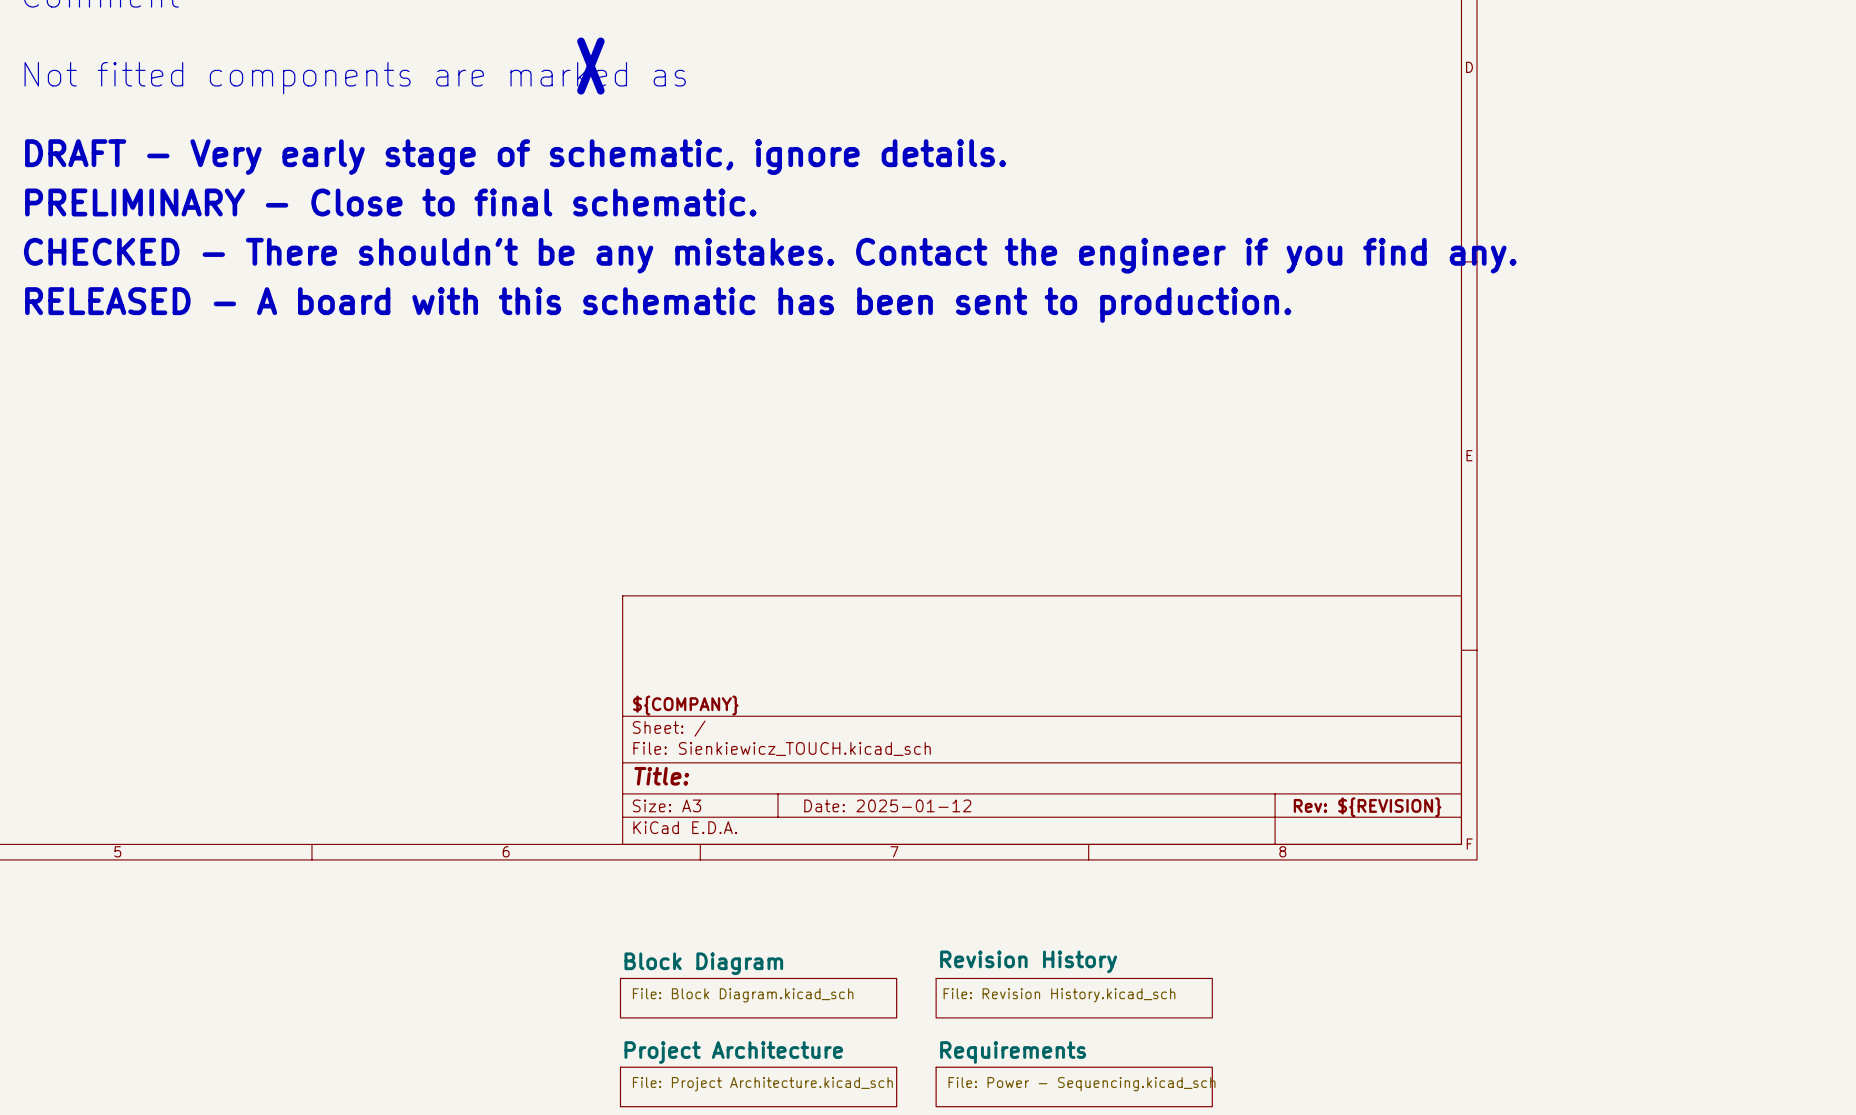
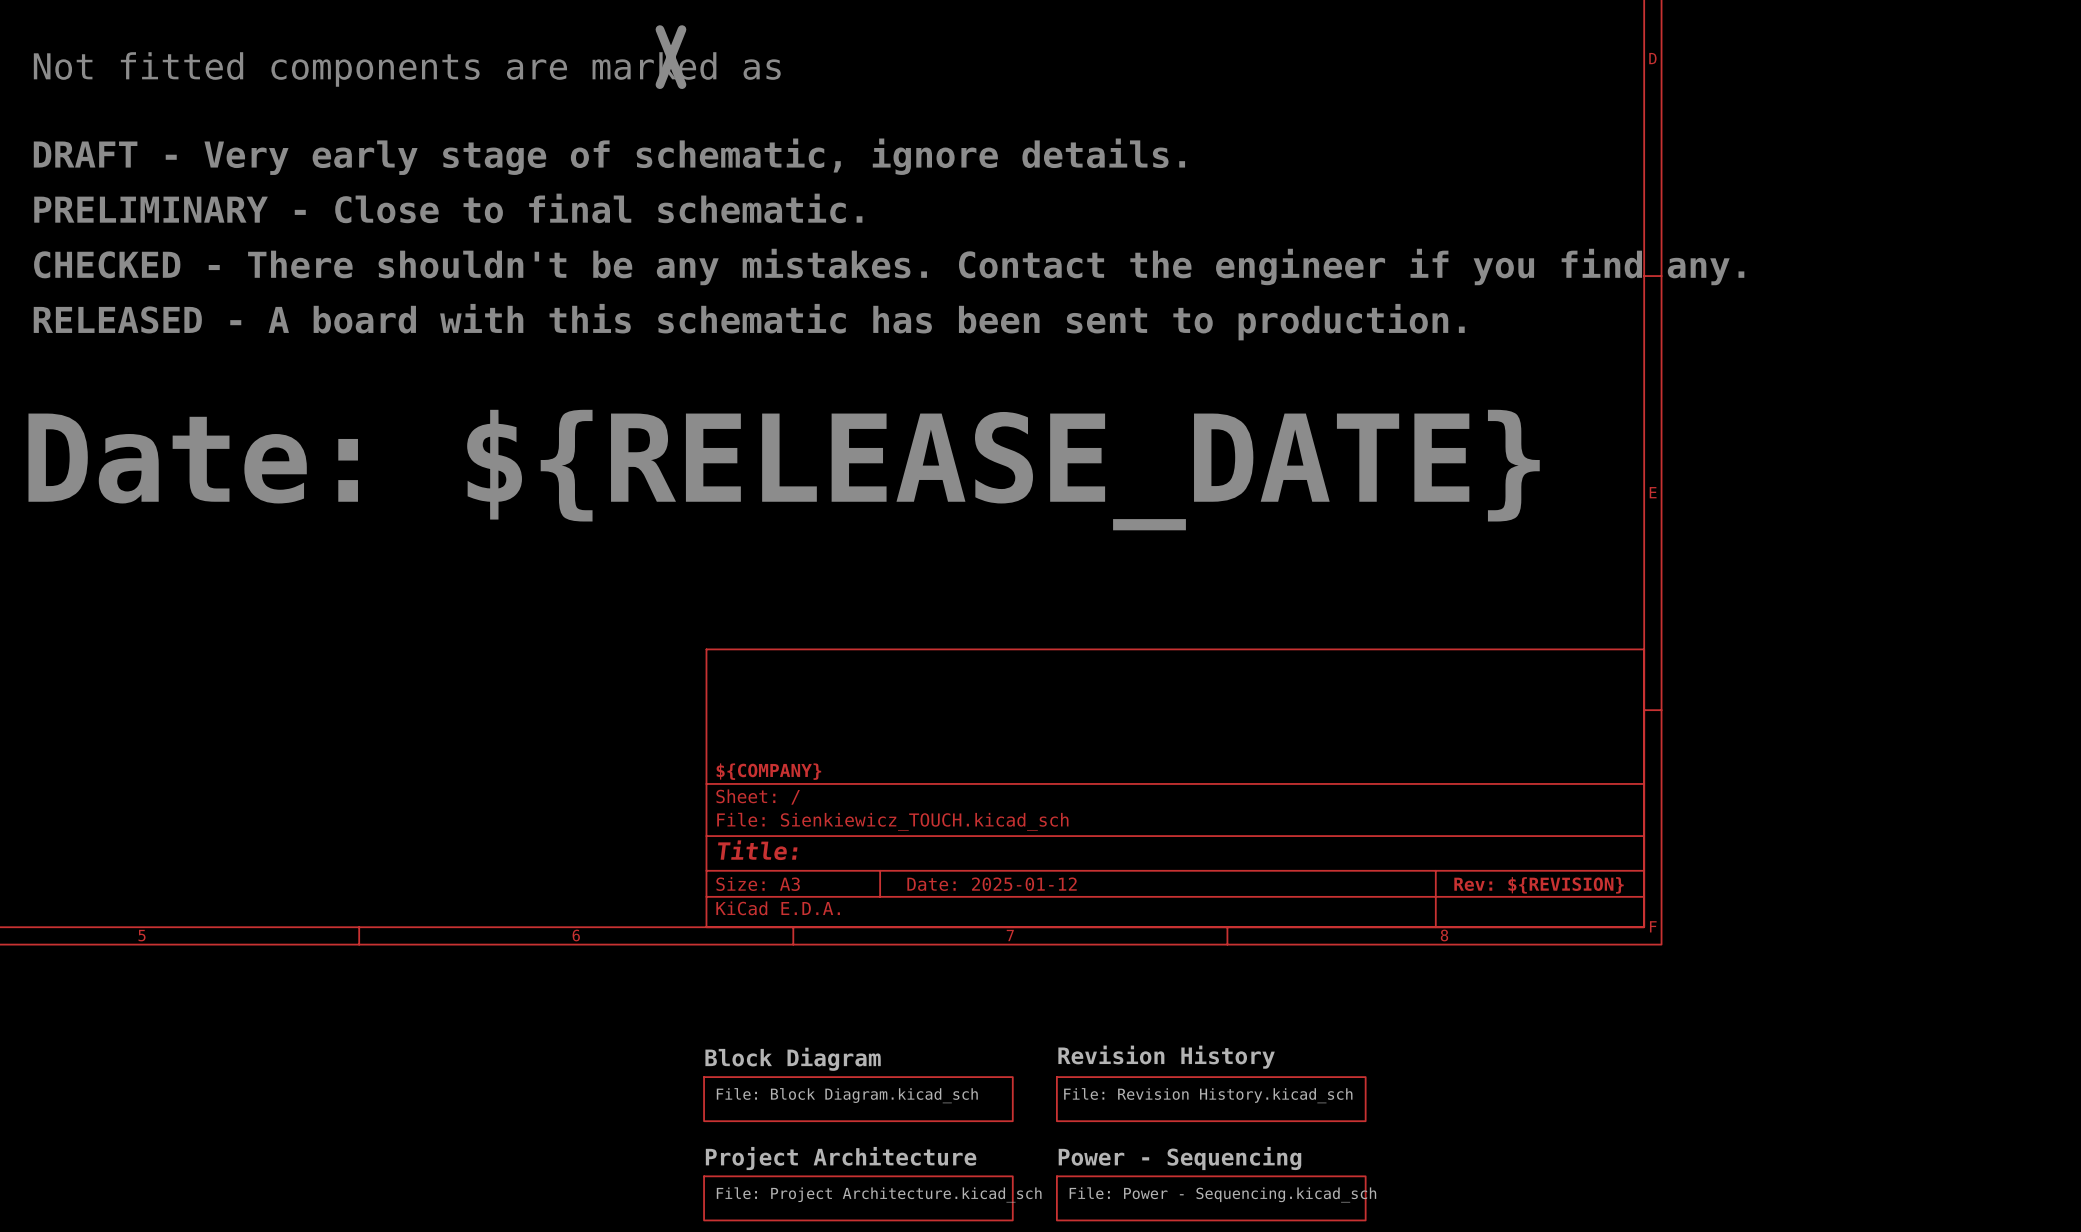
text: none -> Date: ${RELEASE_DATE} (784, 470)
sheet Requirements name: Requirements (1013, 1052) -> Power - Sequencing (1179, 1158)

